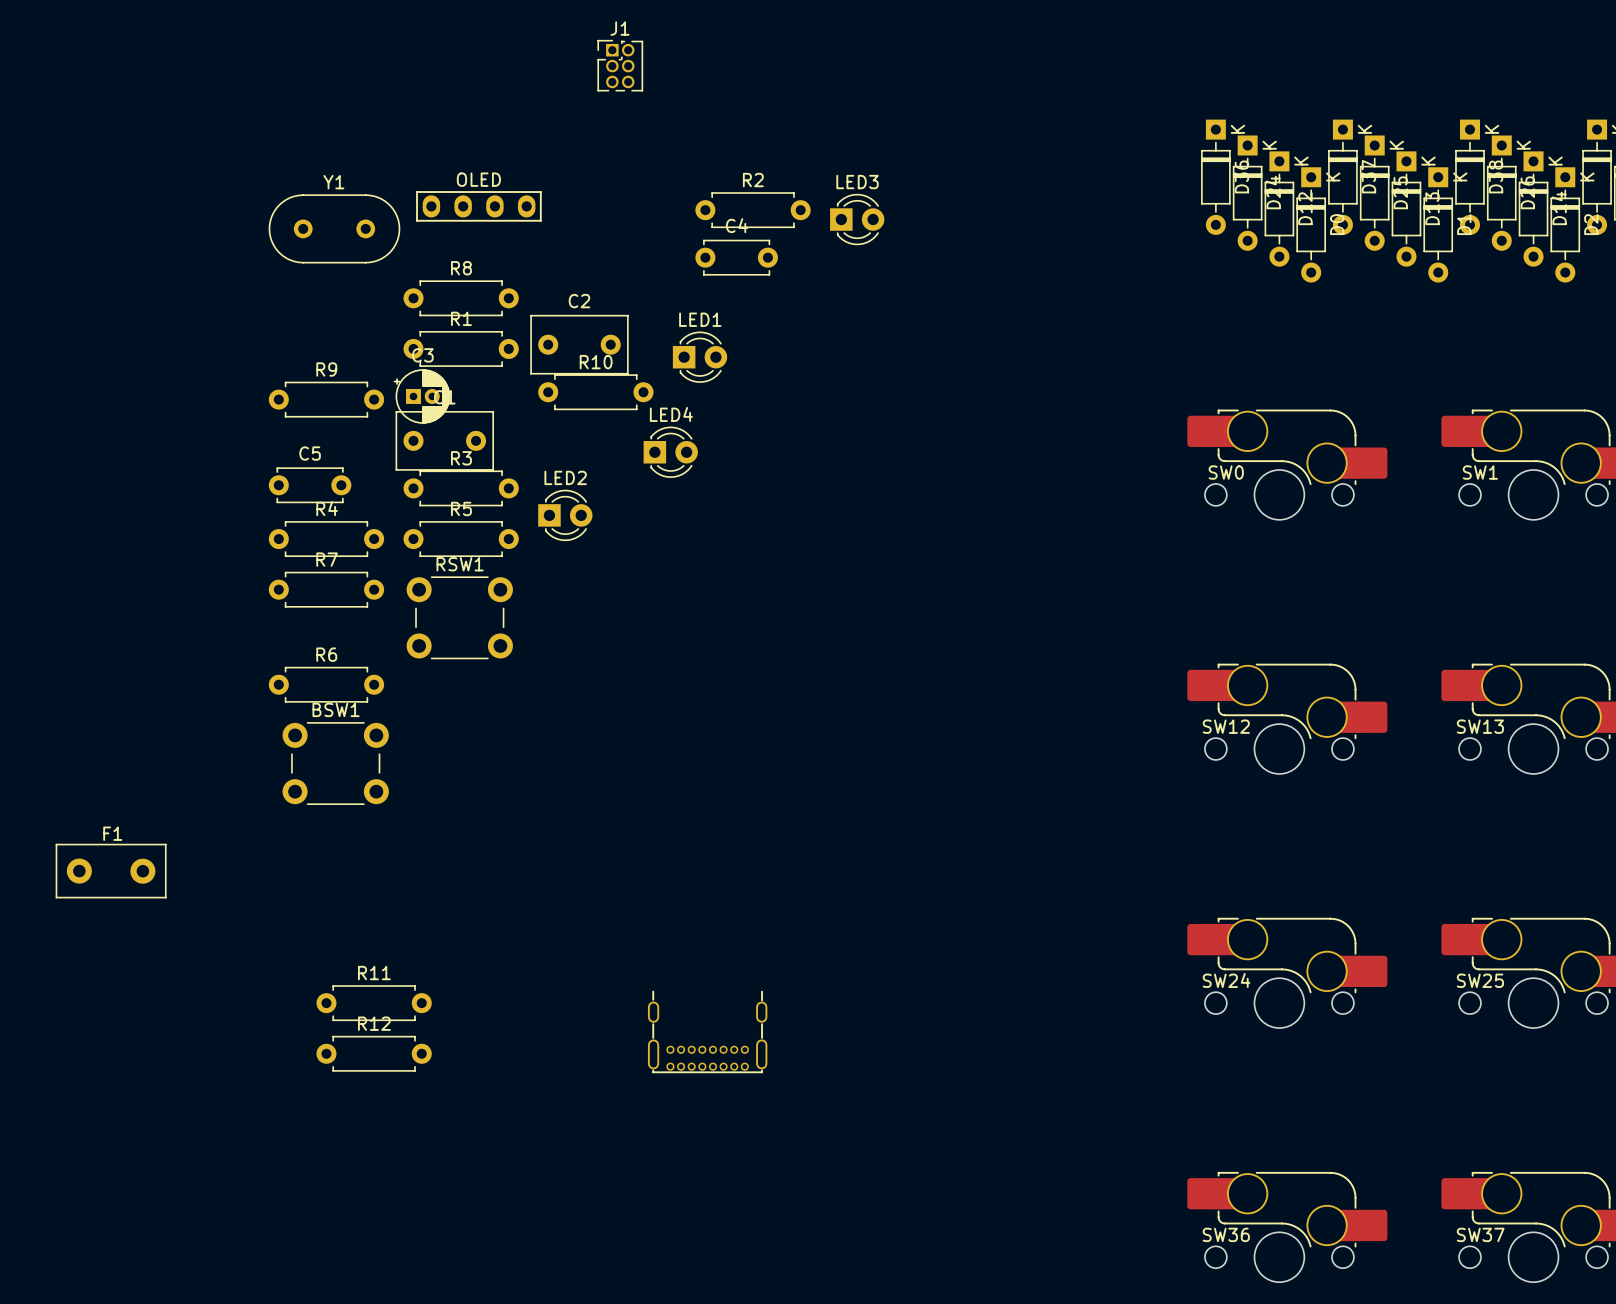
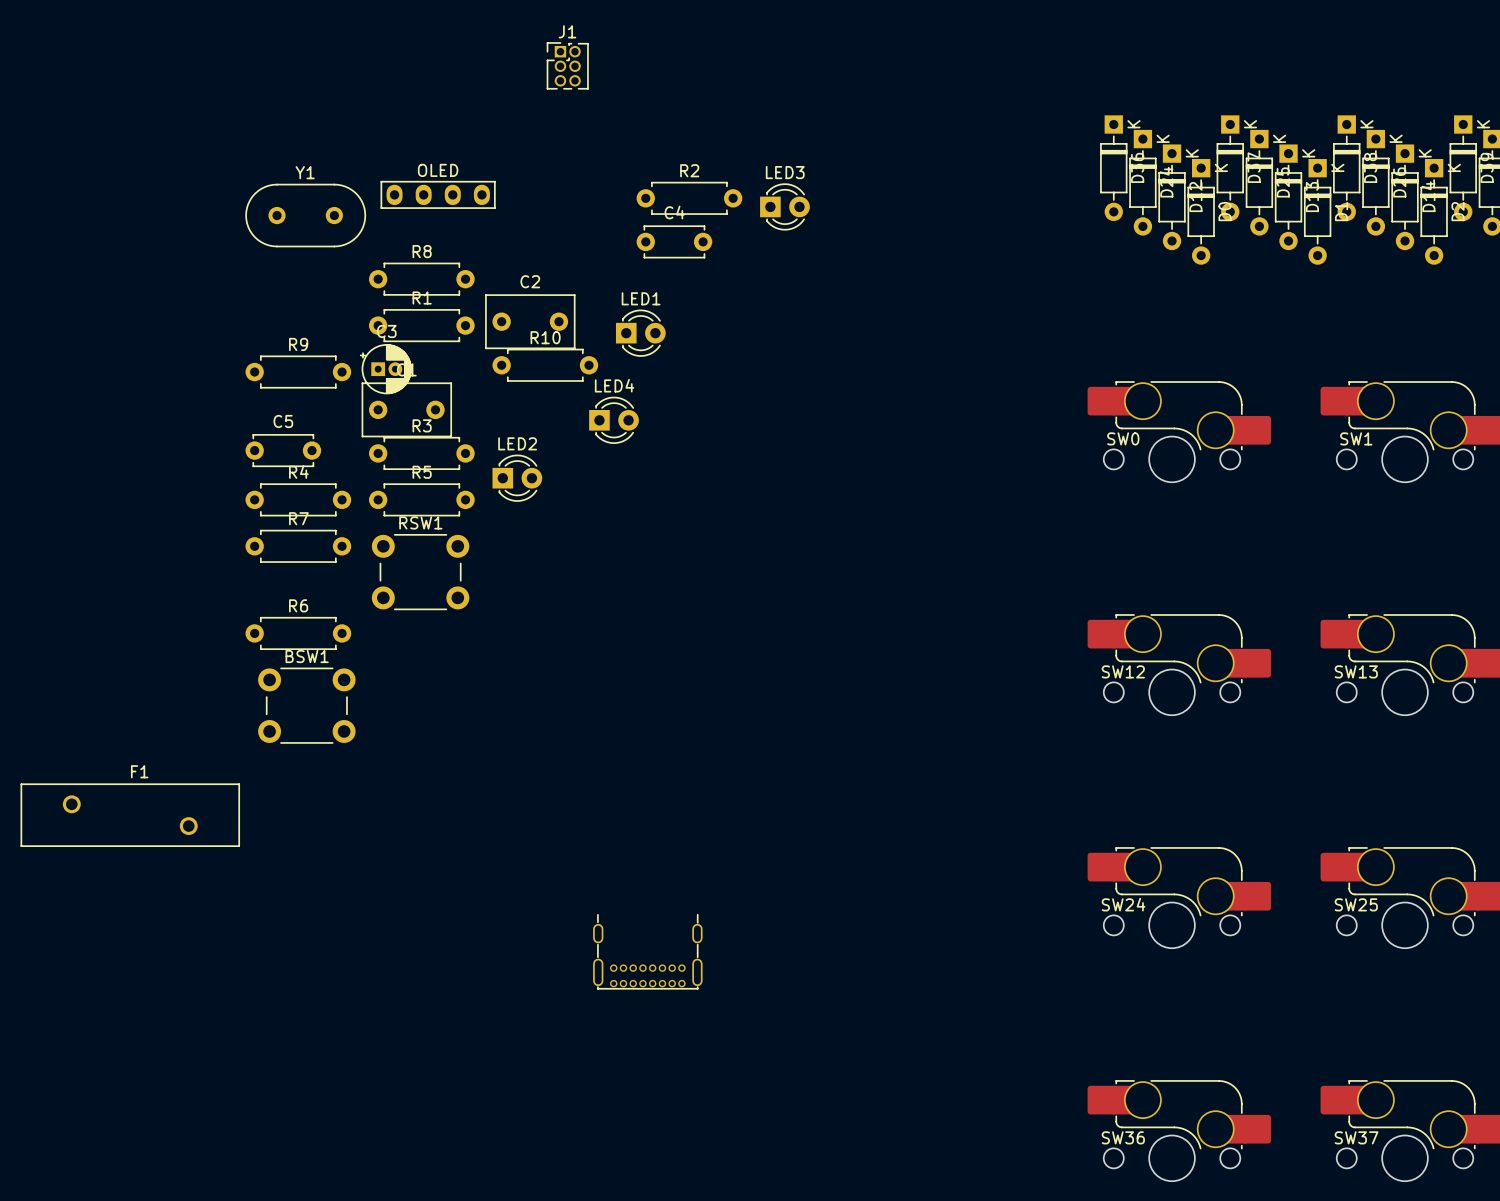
F1 footprint: [55, 843, 167, 899] -> [20, 783, 240, 847]
R11: (374, 1003) -> none
R12: (374, 1053) -> none

